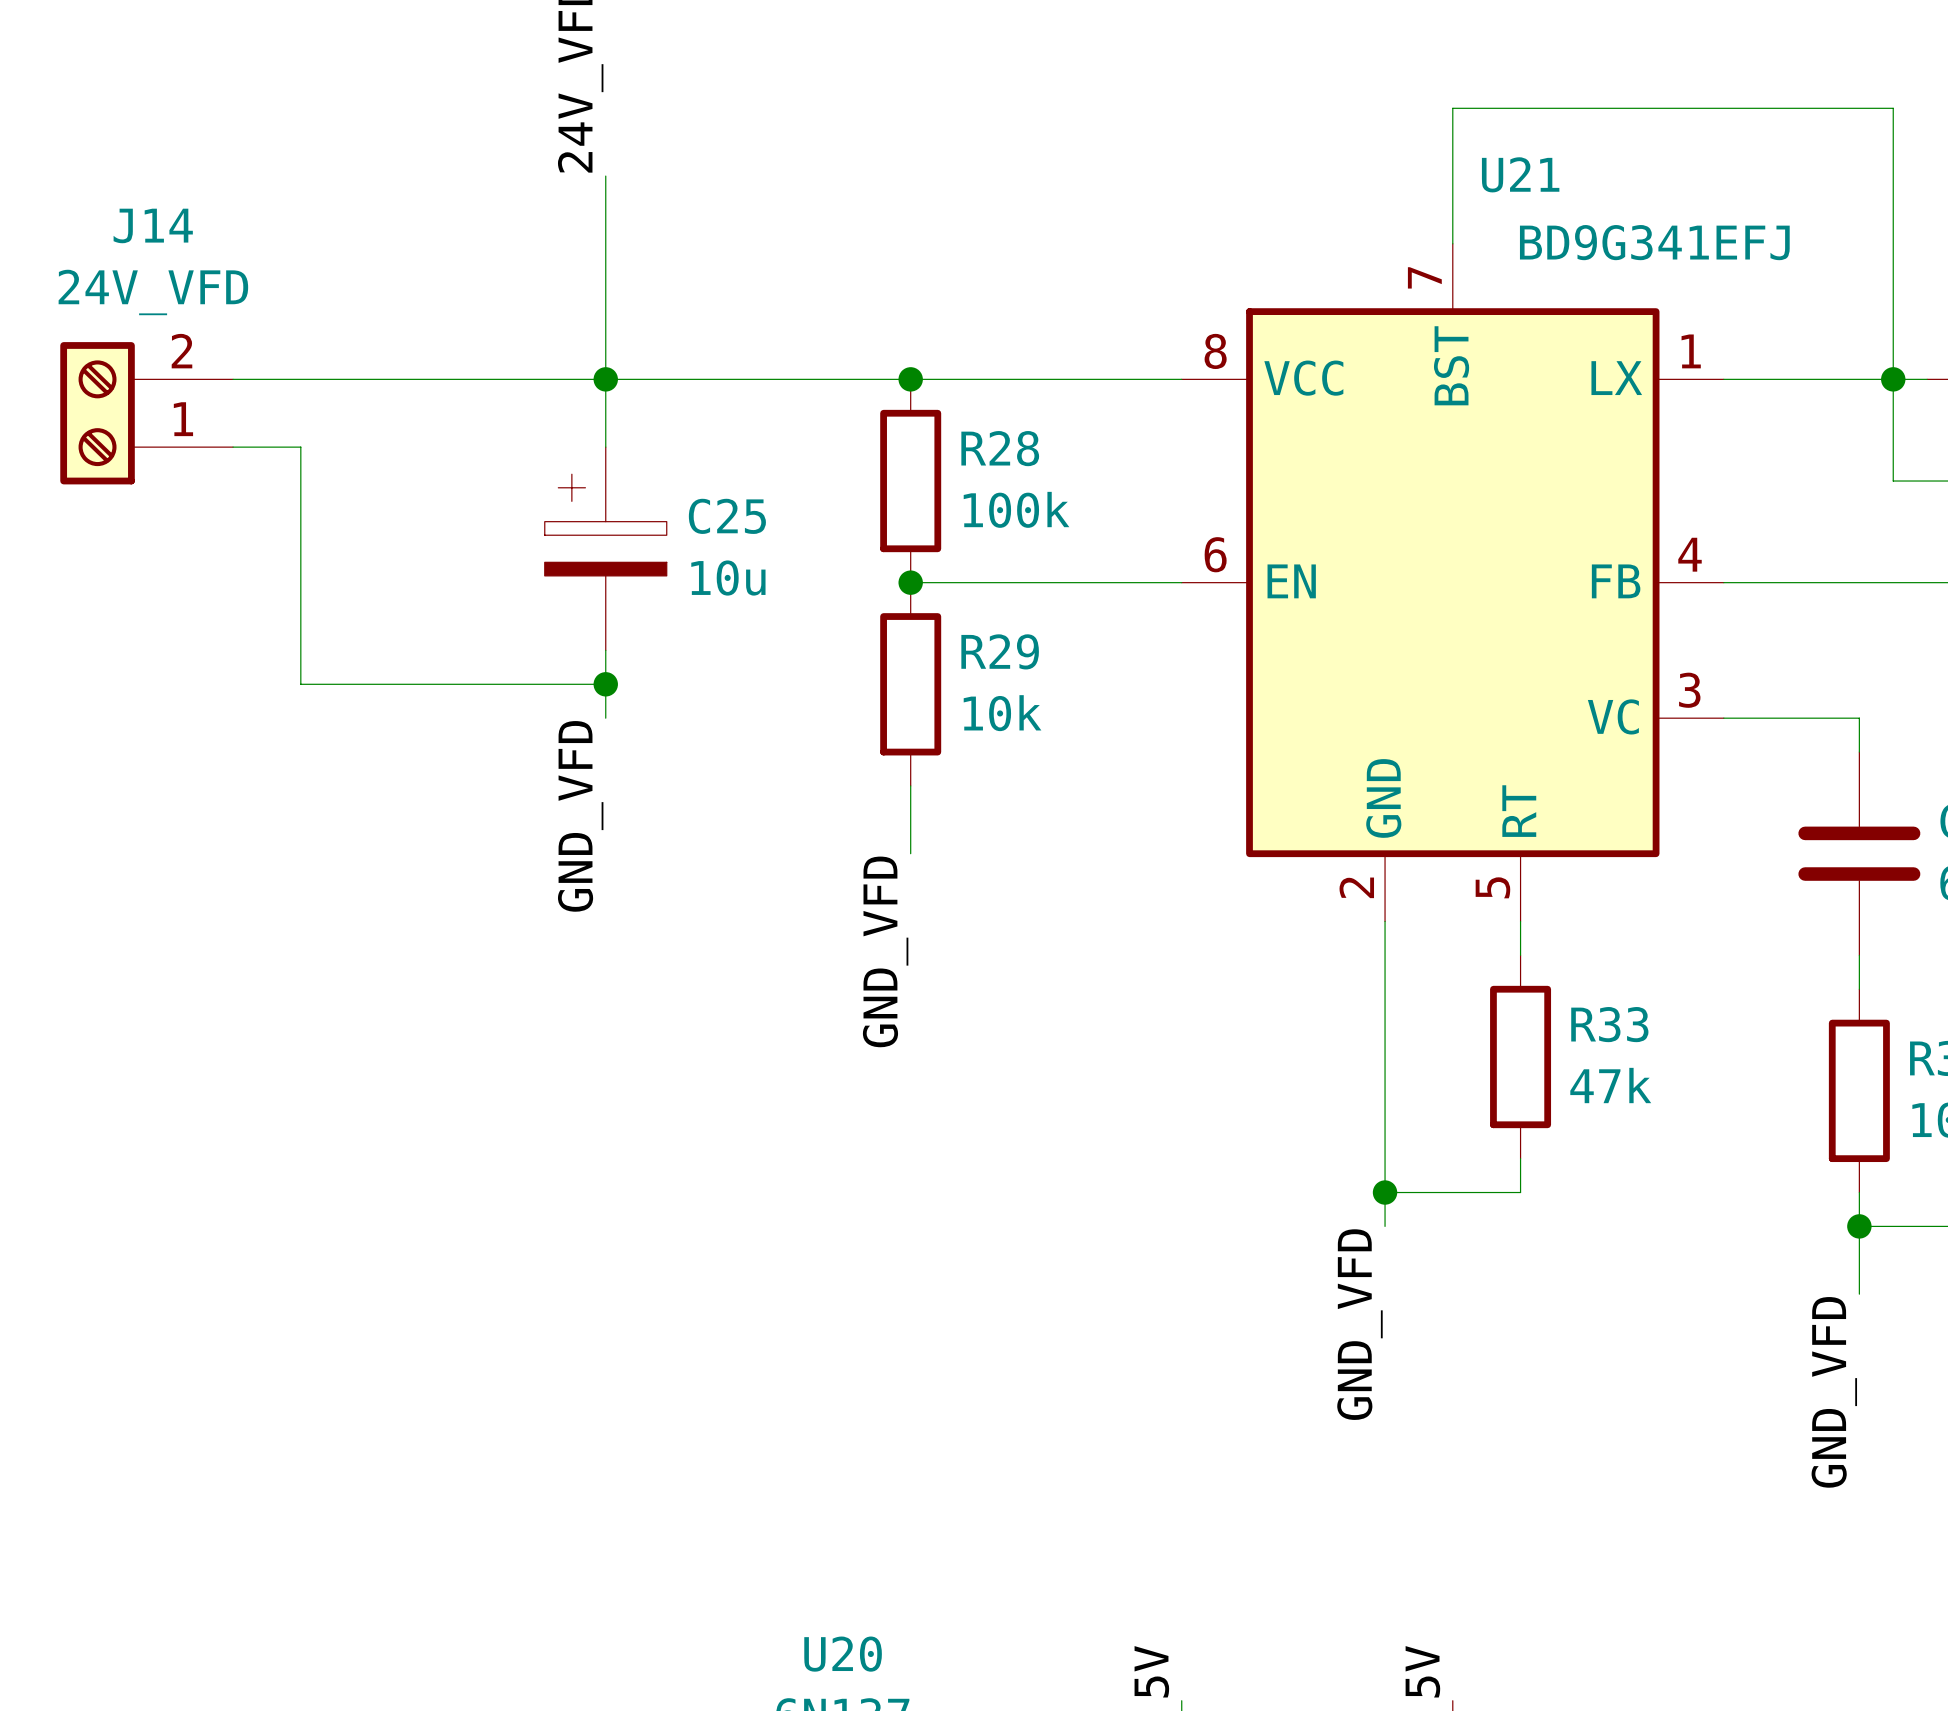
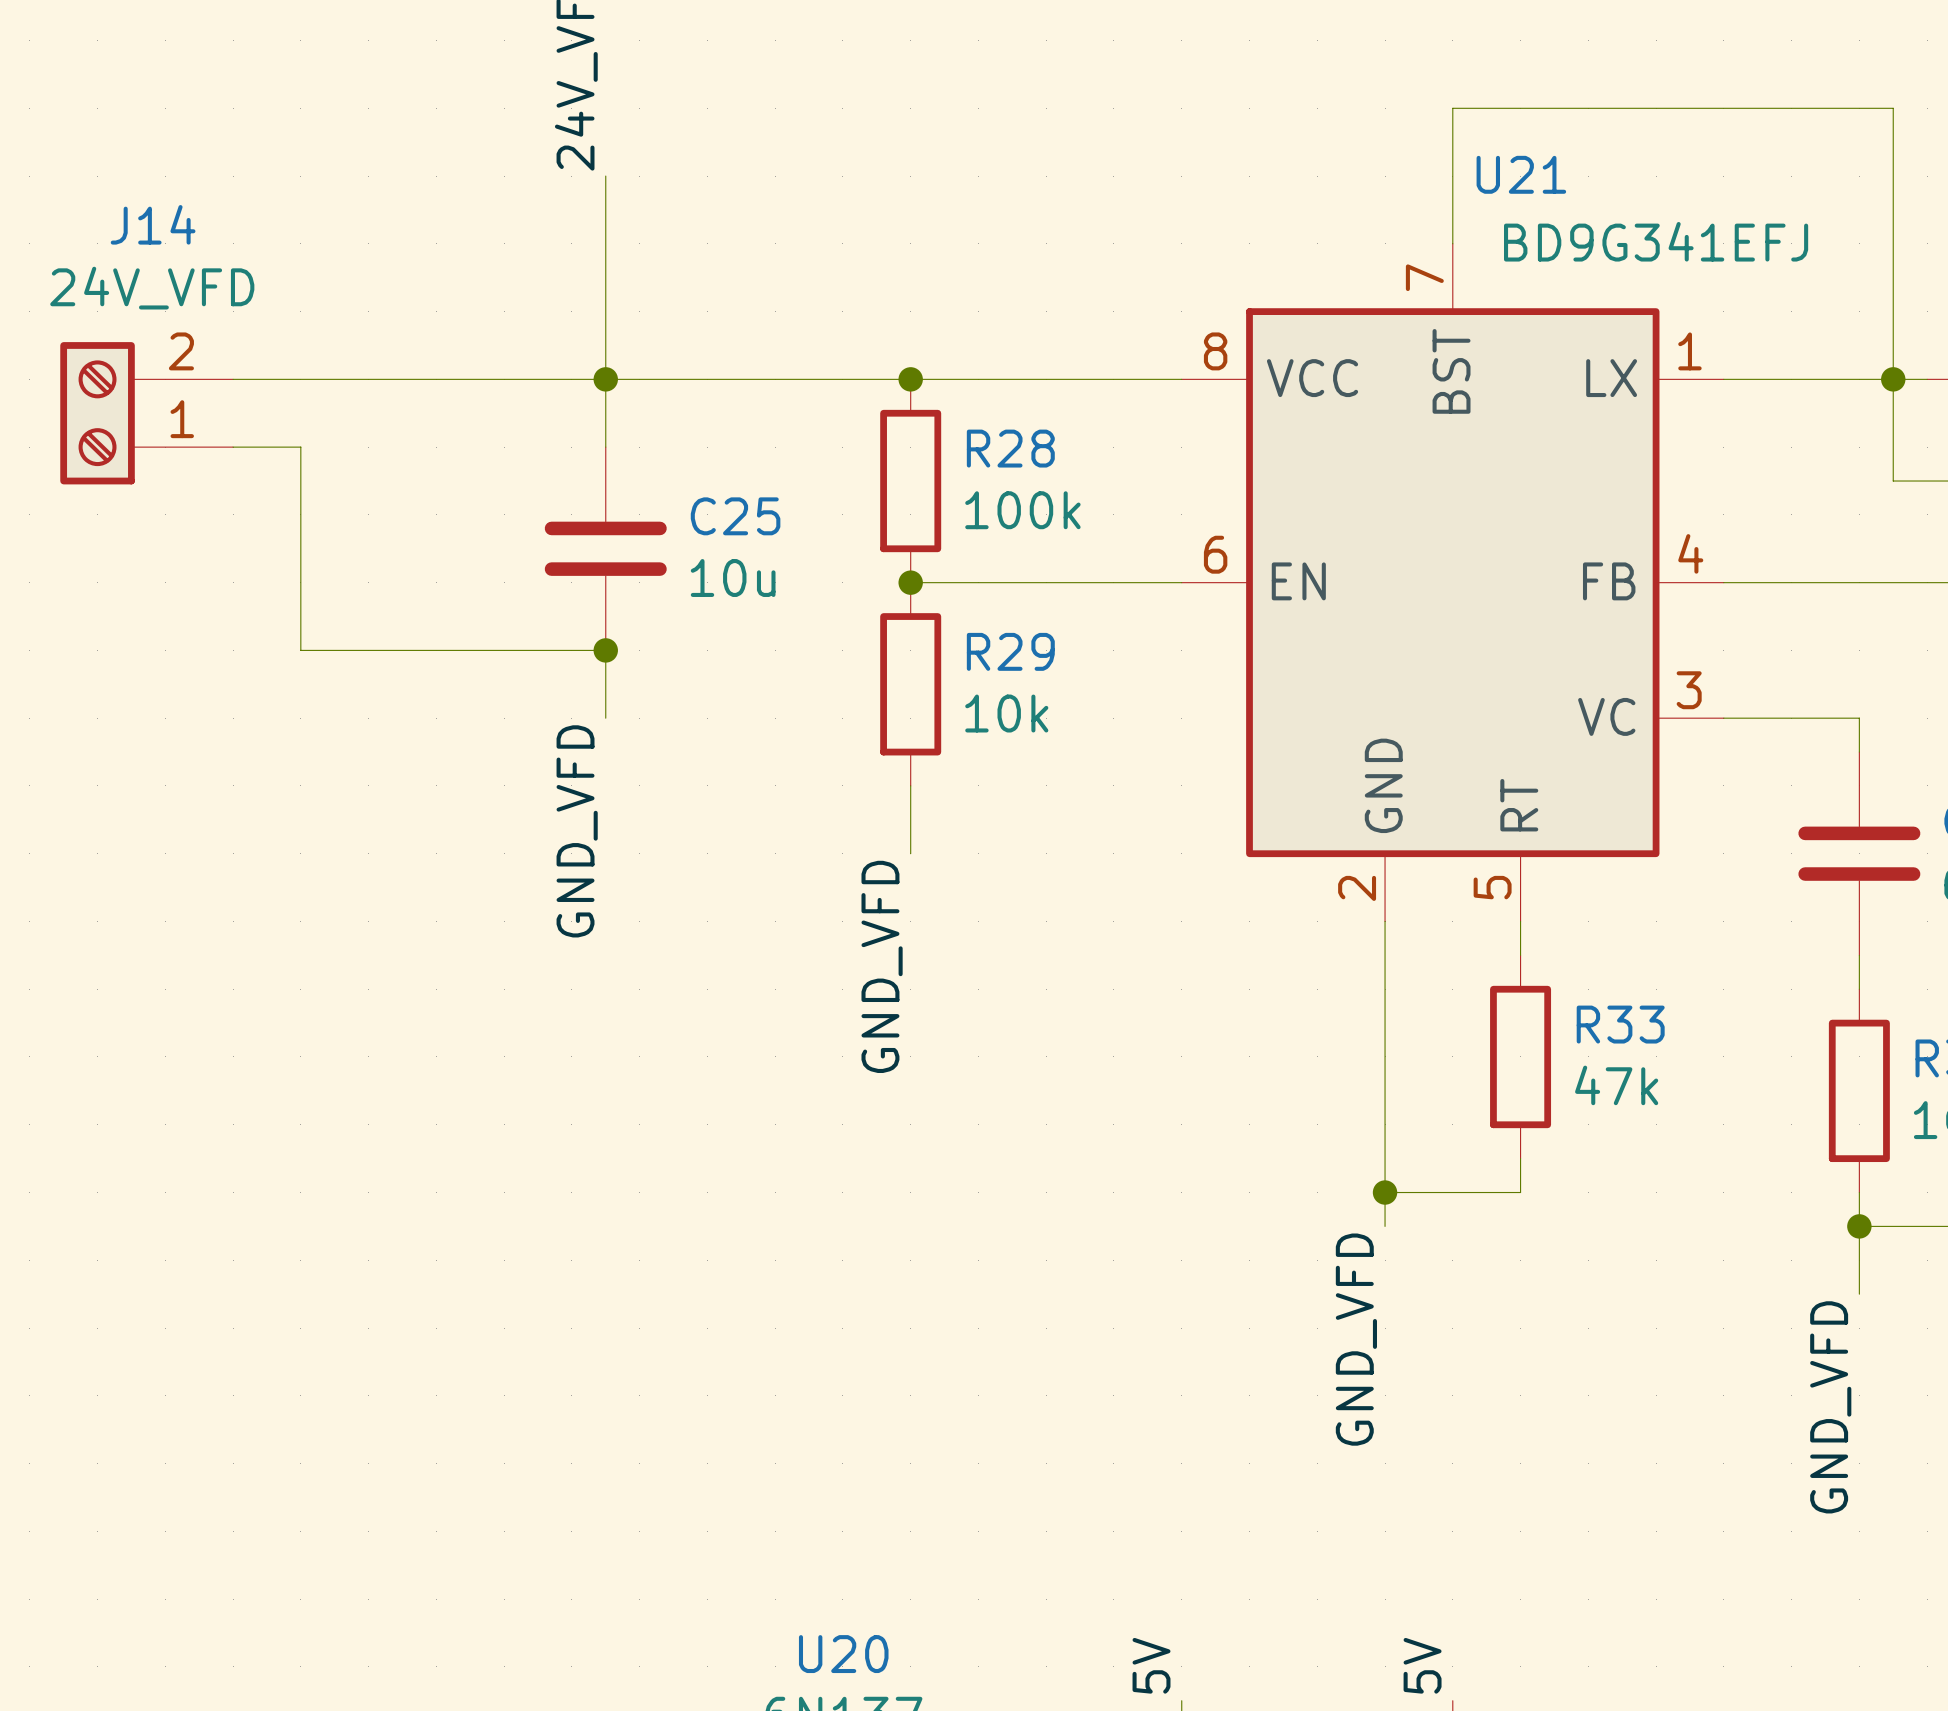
C25 symbol: [544, 447, 667, 651] -> [544, 447, 667, 651]
wire: (300, 650) (300, 684) (605, 684) -> (300, 650) (605, 650)
junction position: (605, 684) -> (605, 650)

